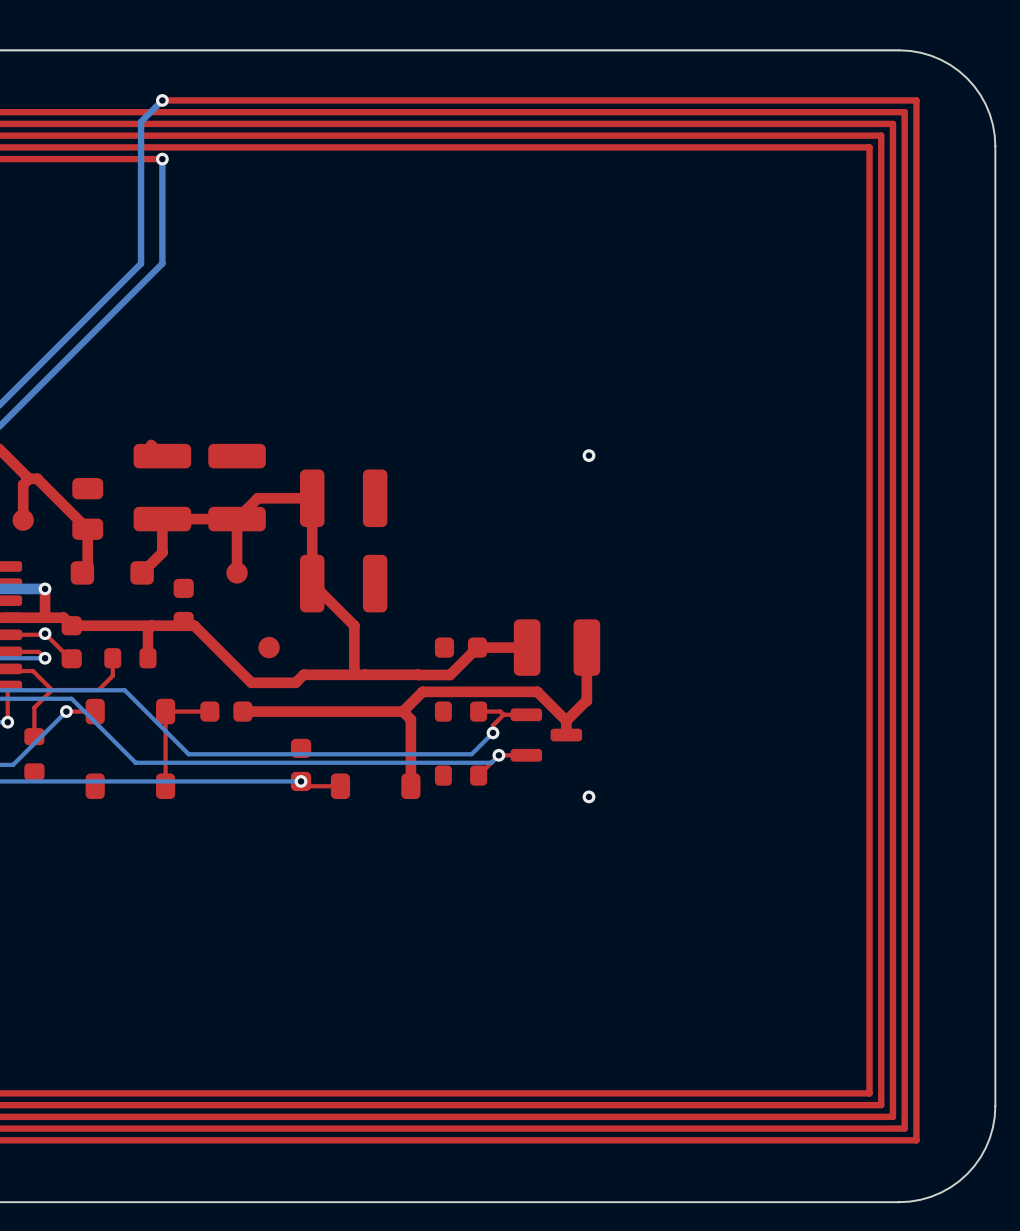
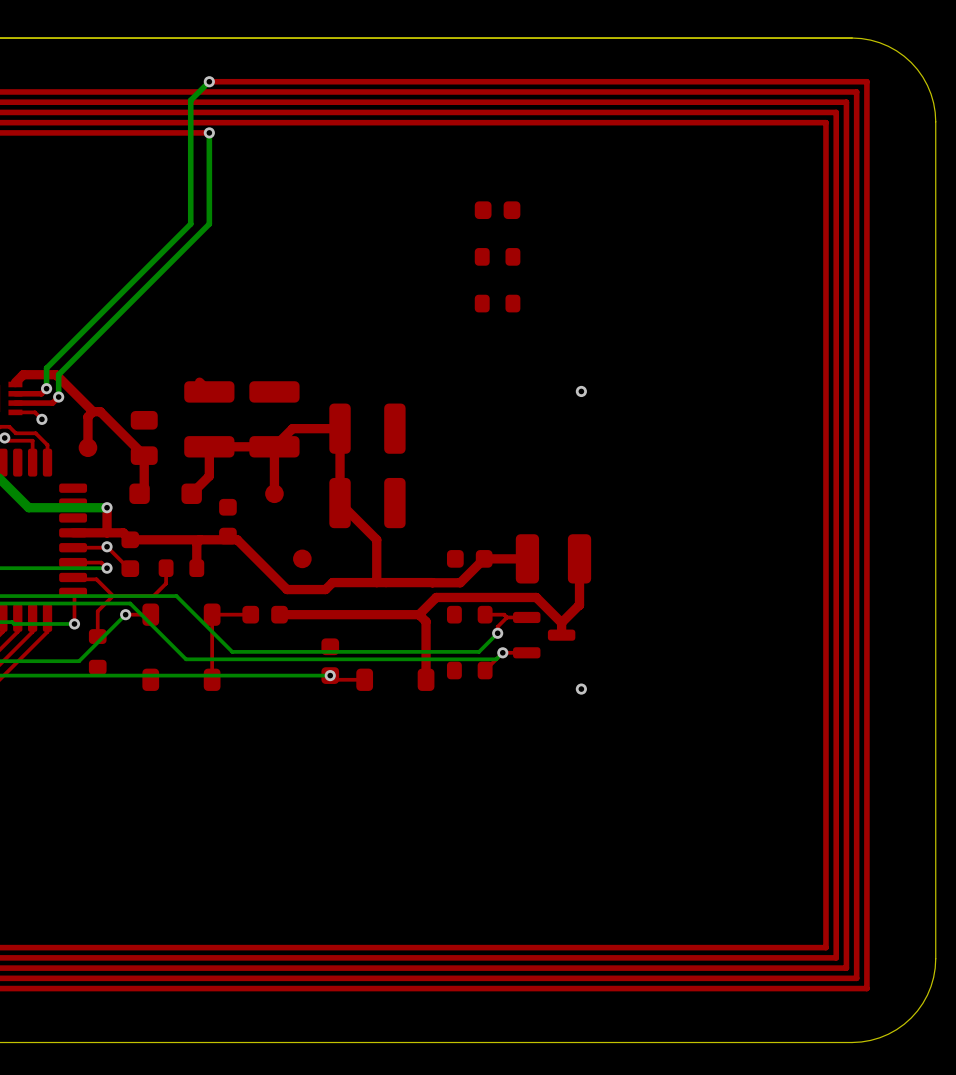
part: none -> (497, 210)
part: none -> (497, 256)
part: none -> (497, 303)

